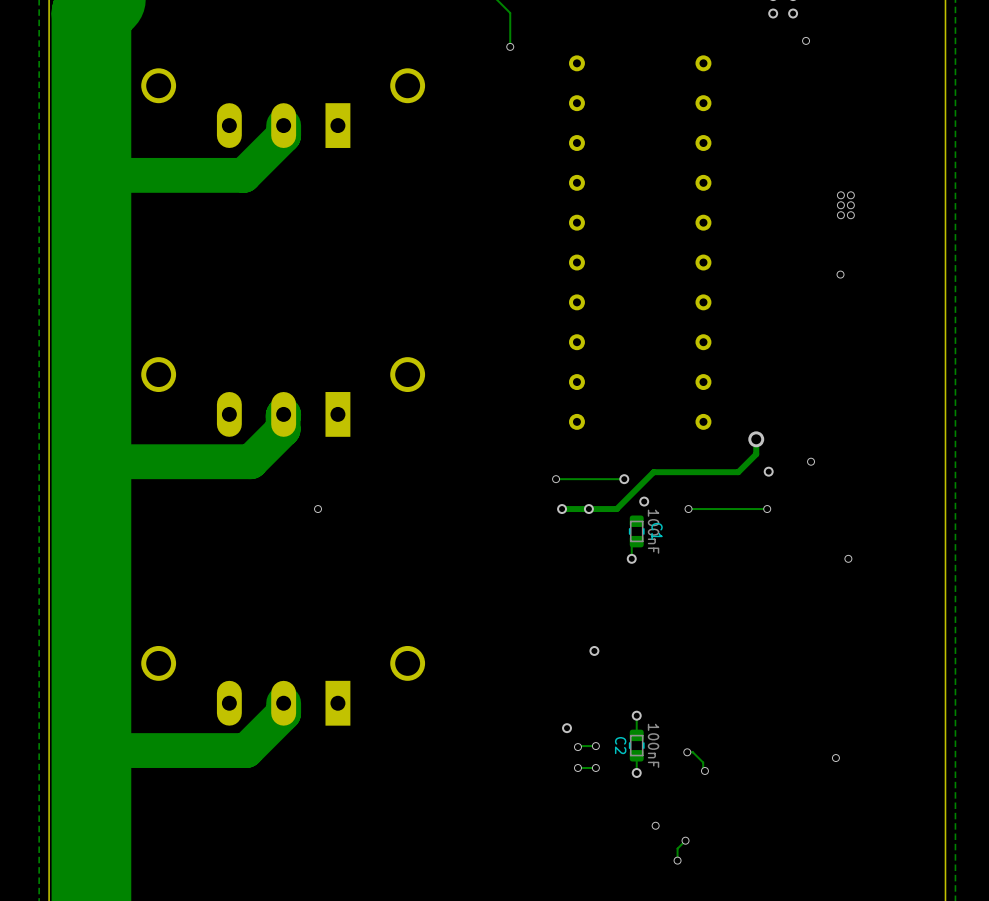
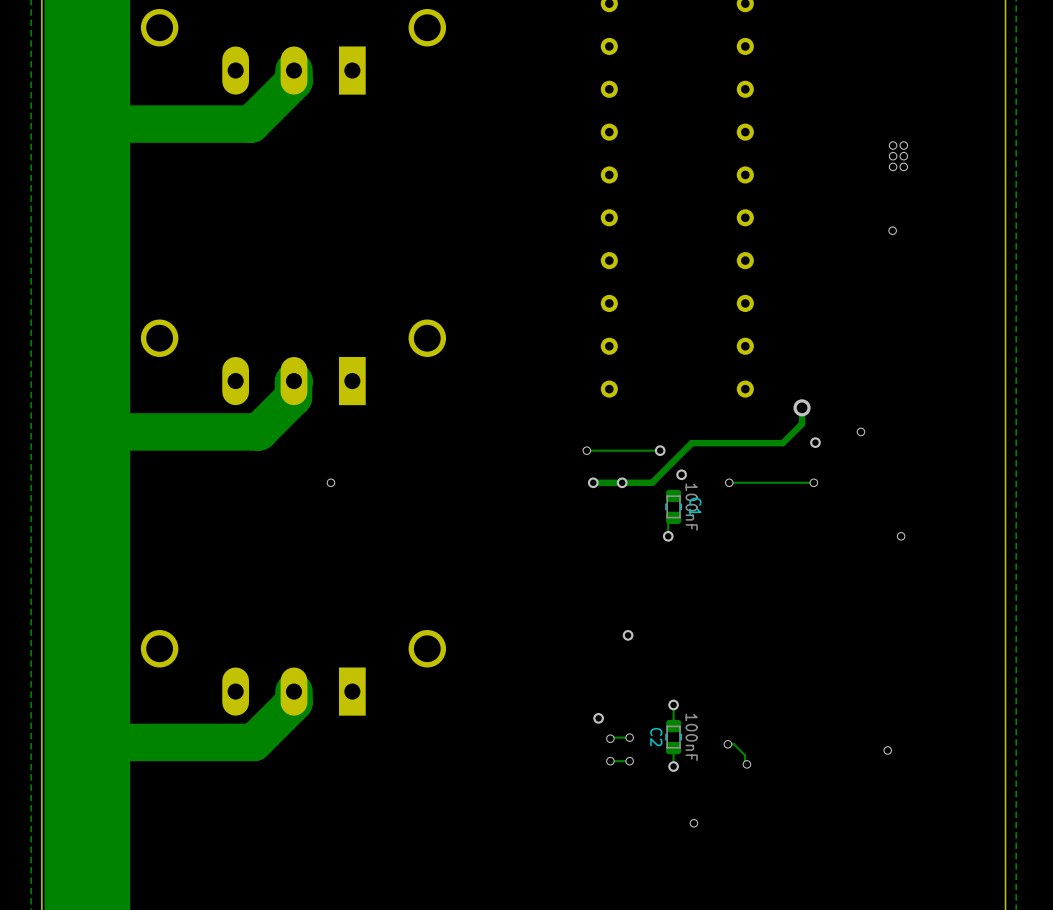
track: (685, 840) (677, 848) (677, 860) -> none
via: (685, 840) -> none
via: (677, 860) -> none

